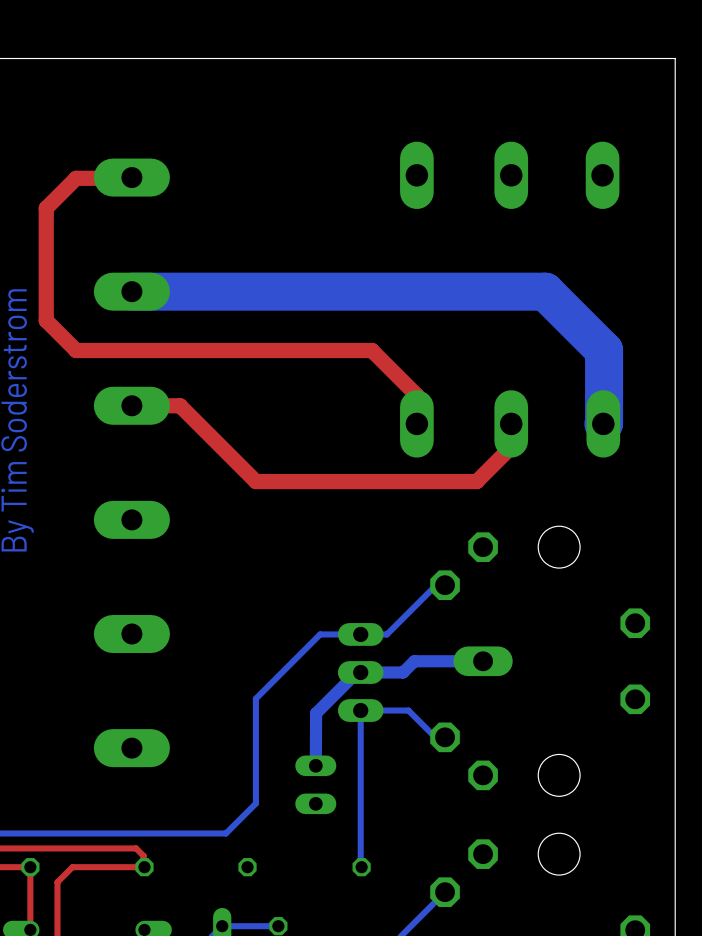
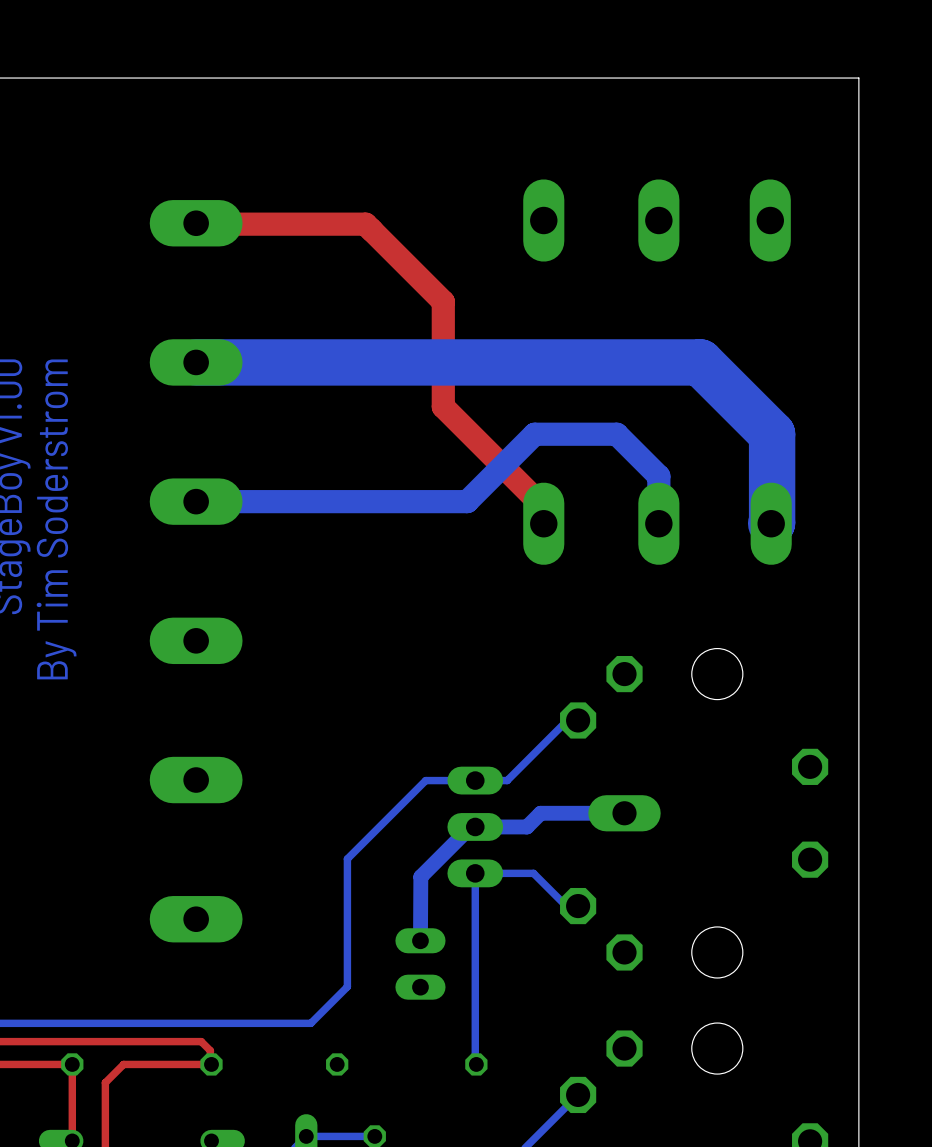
top track: (131, 177) (76, 178) (46, 208) (46, 320) (76, 350) (371, 350) (416, 395) (416, 410) -> (196, 223) (365, 224) (443, 301) (443, 406) (543, 507)
top track: (131, 405) (180, 405) (255, 481) (476, 481) (511, 447) (511, 423) -> none
bottom track: none -> (196, 501) (467, 501) (534, 434) (616, 434) (658, 476) (658, 523)

